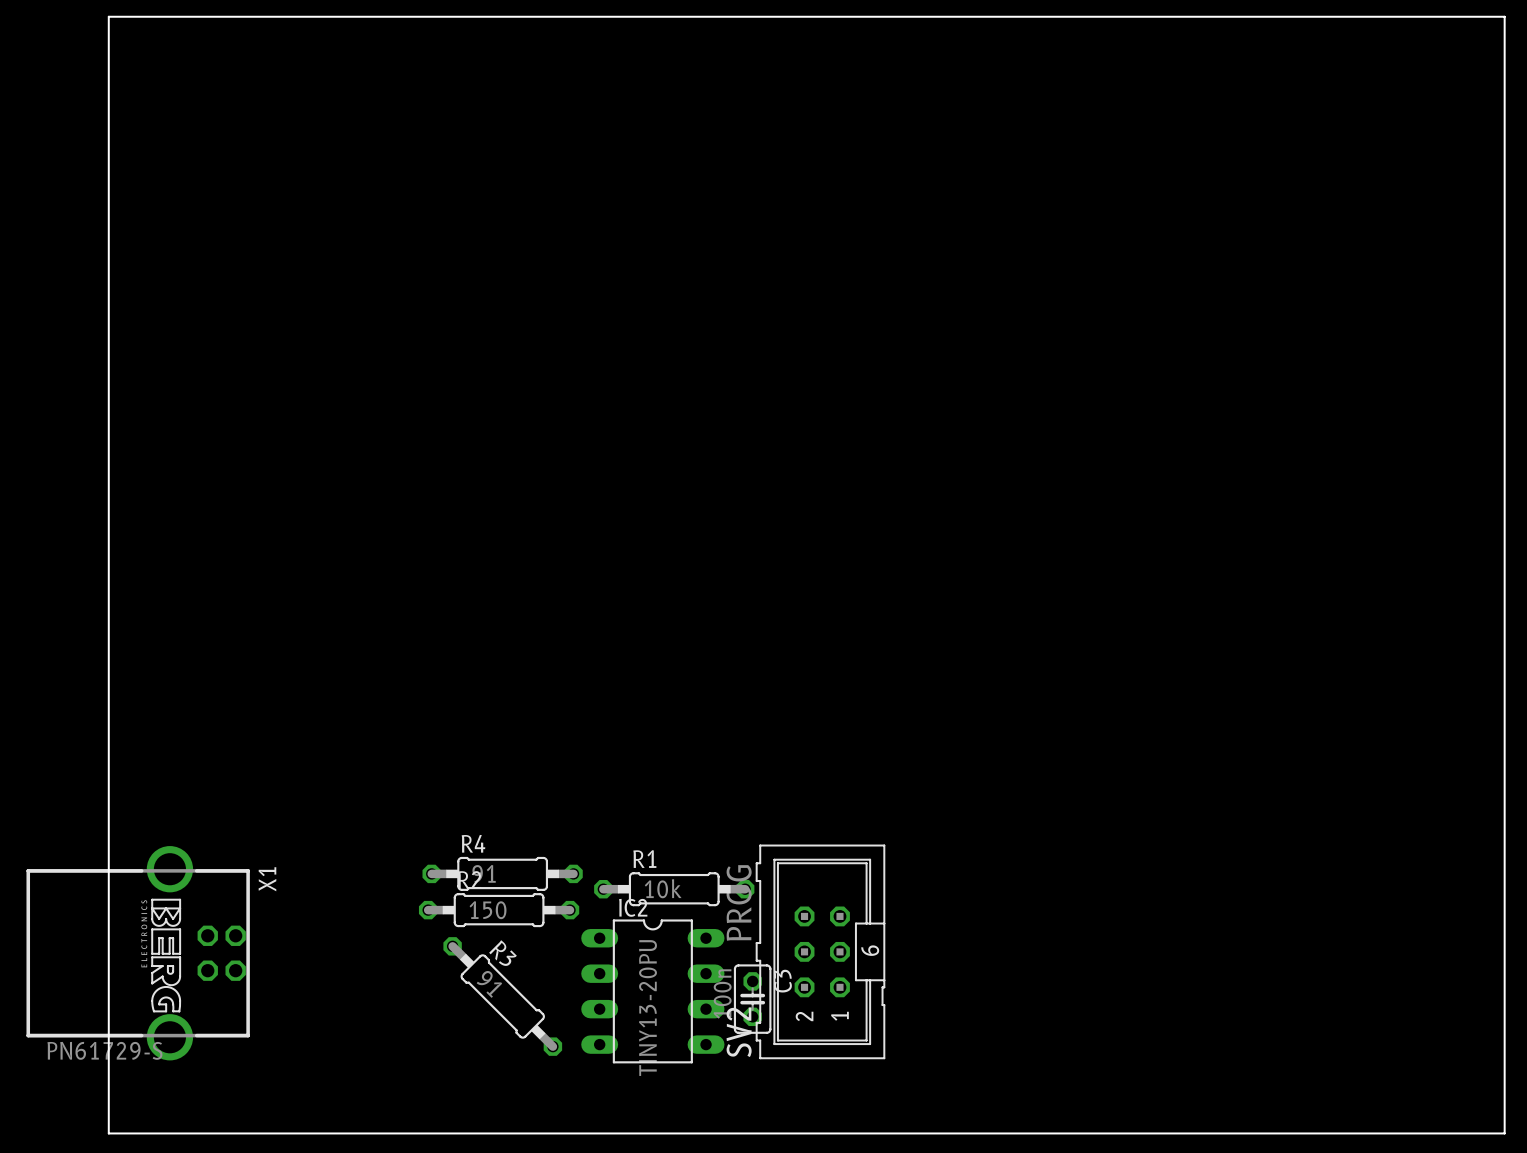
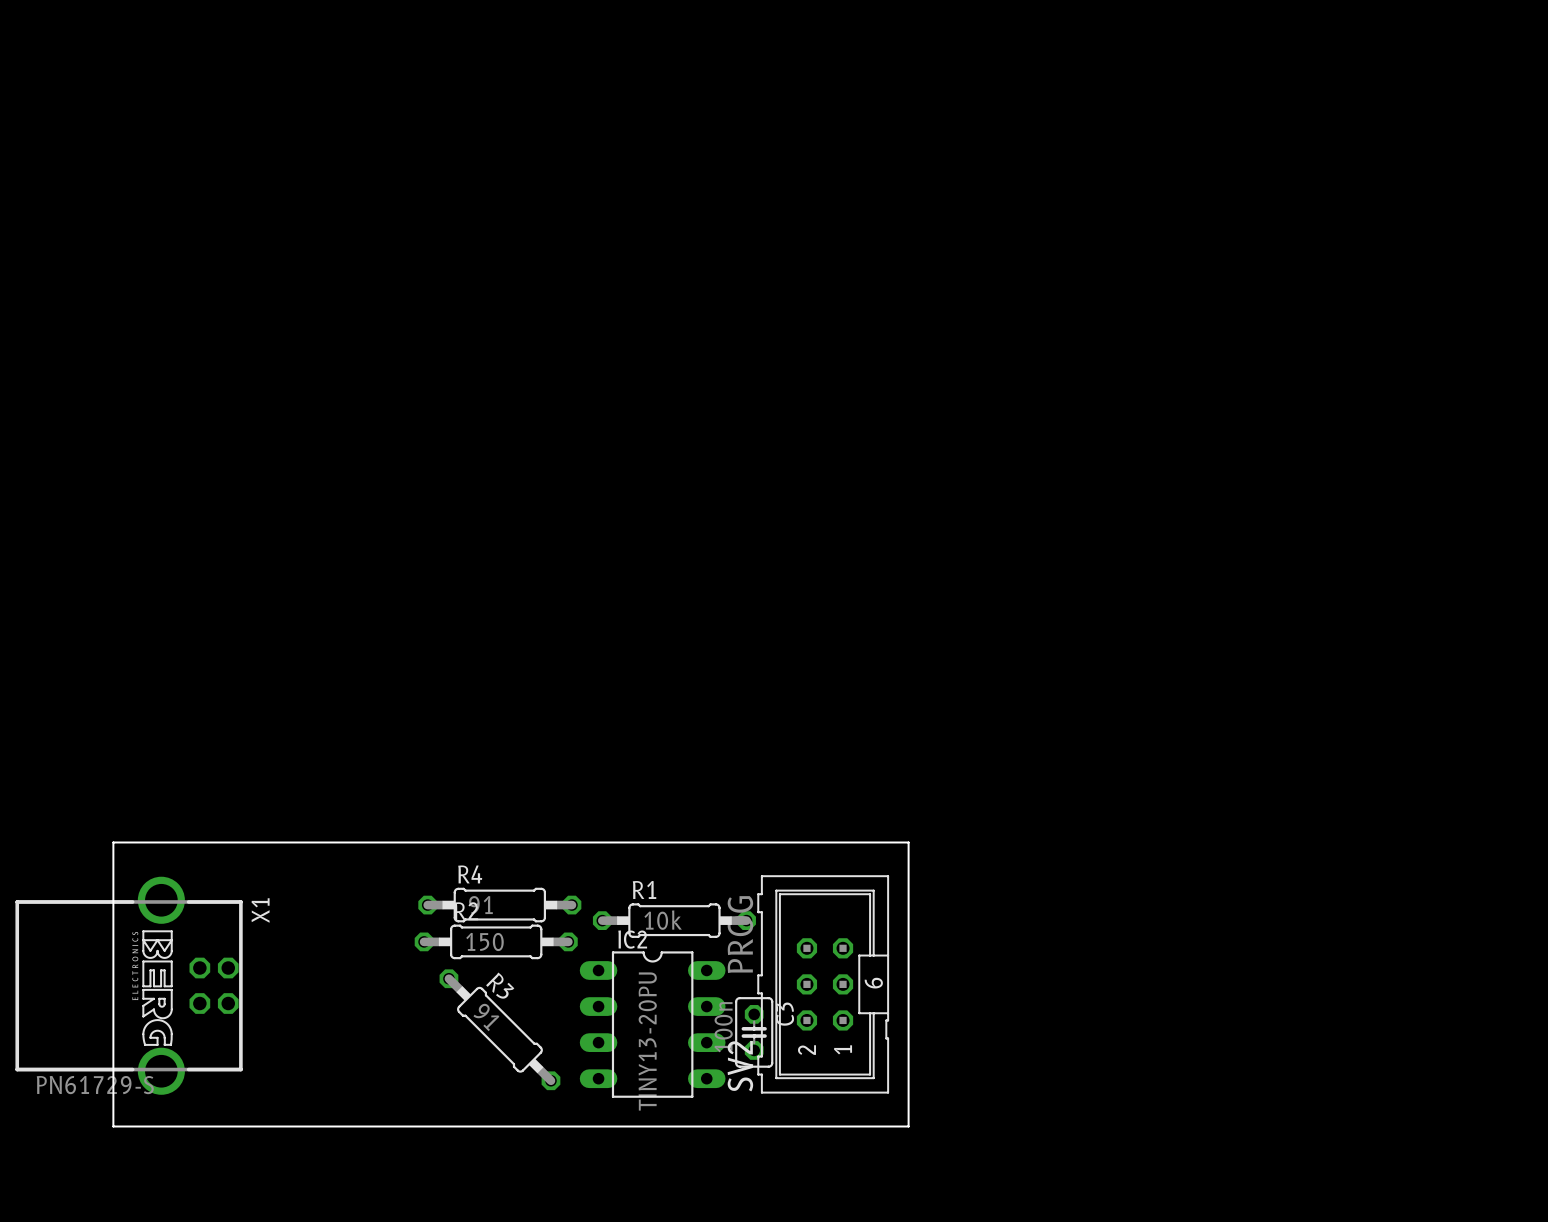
board edge: (108, 16) (1504, 16) (1504, 1133) (108, 1133) (108, 16) -> none
board edge: none -> (113, 842) (908, 842) (908, 1126) (113, 1126) (113, 842)

